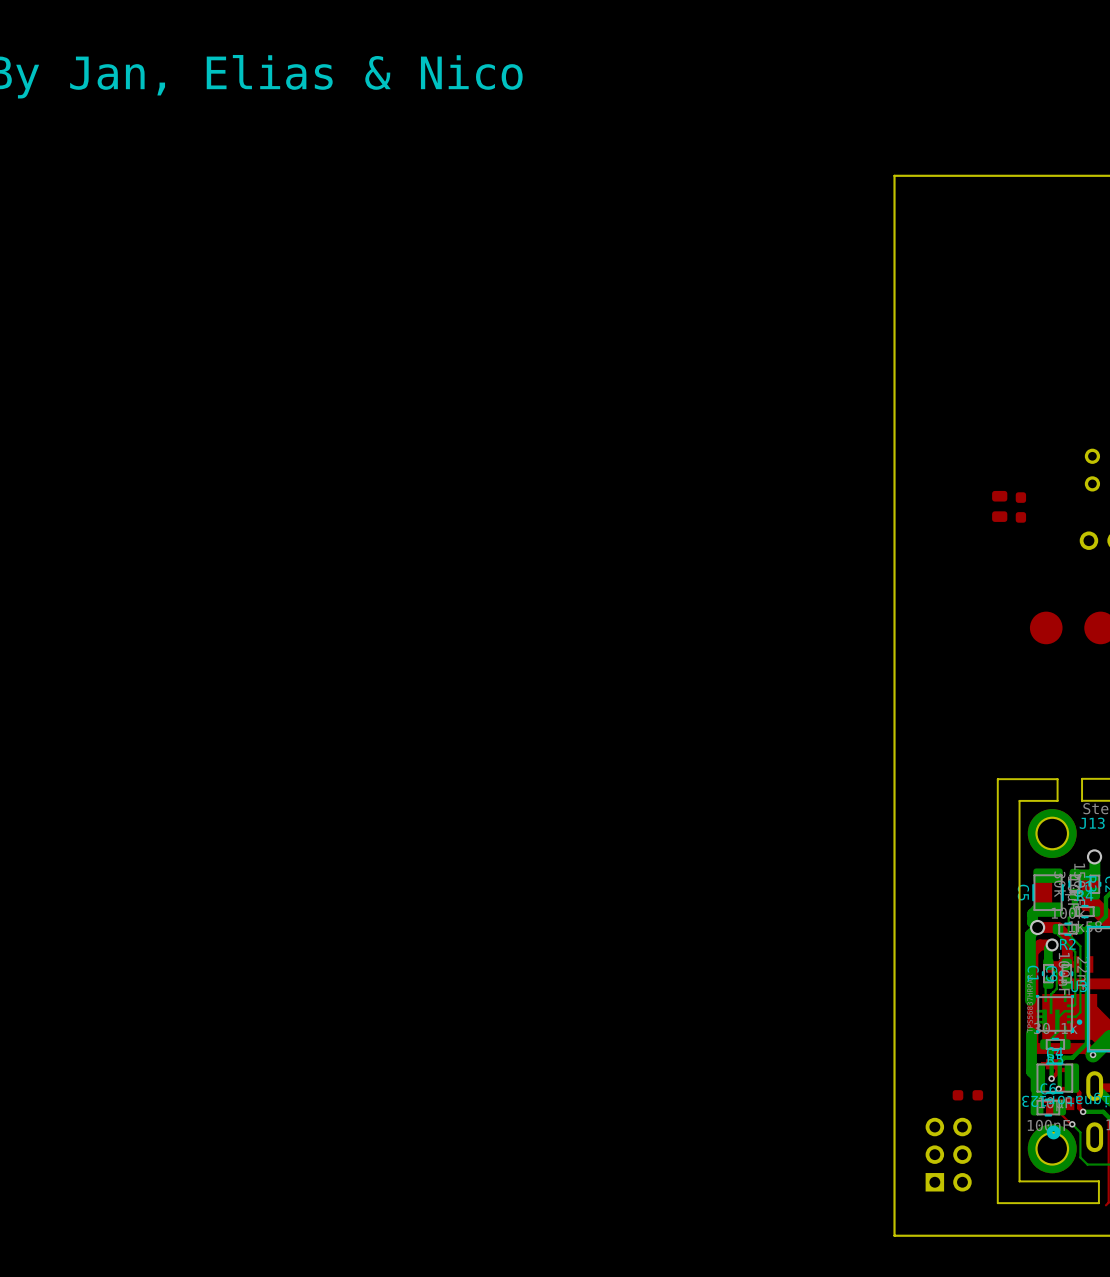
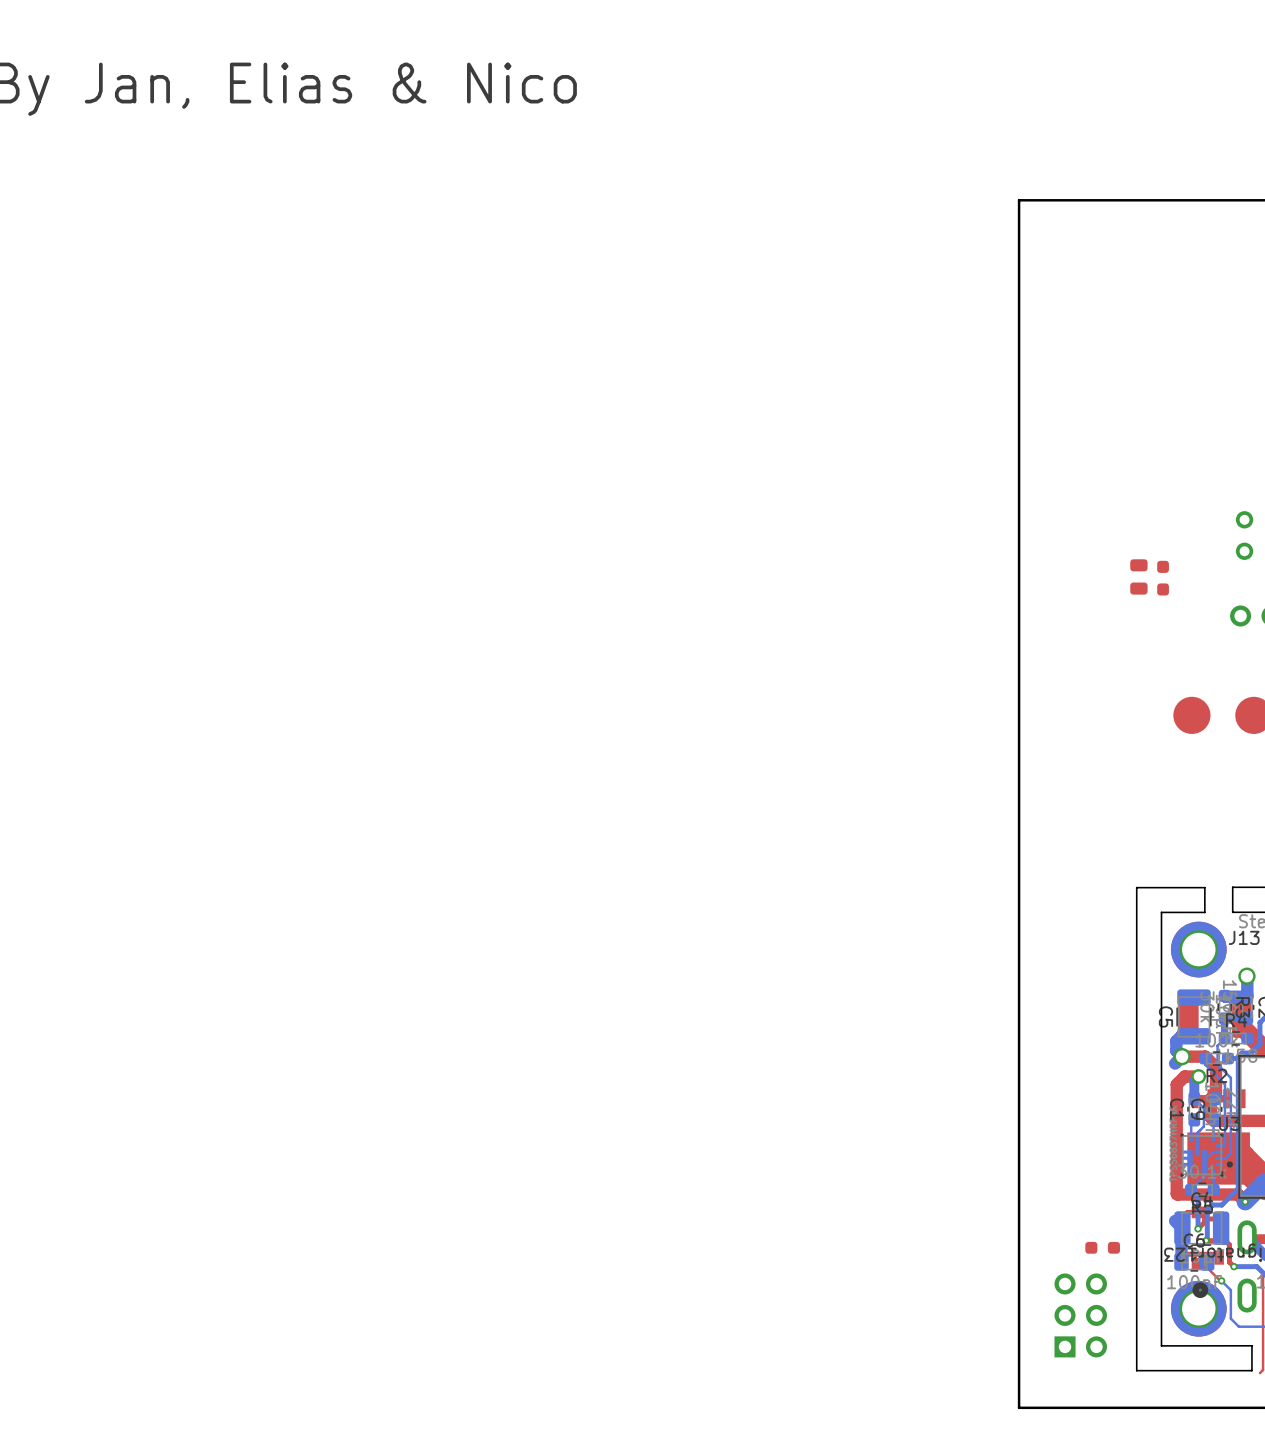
bottom track: (1031, 933) (1030, 1000) -> none
bottom track: (1031, 1033) (1031, 1071) -> none

